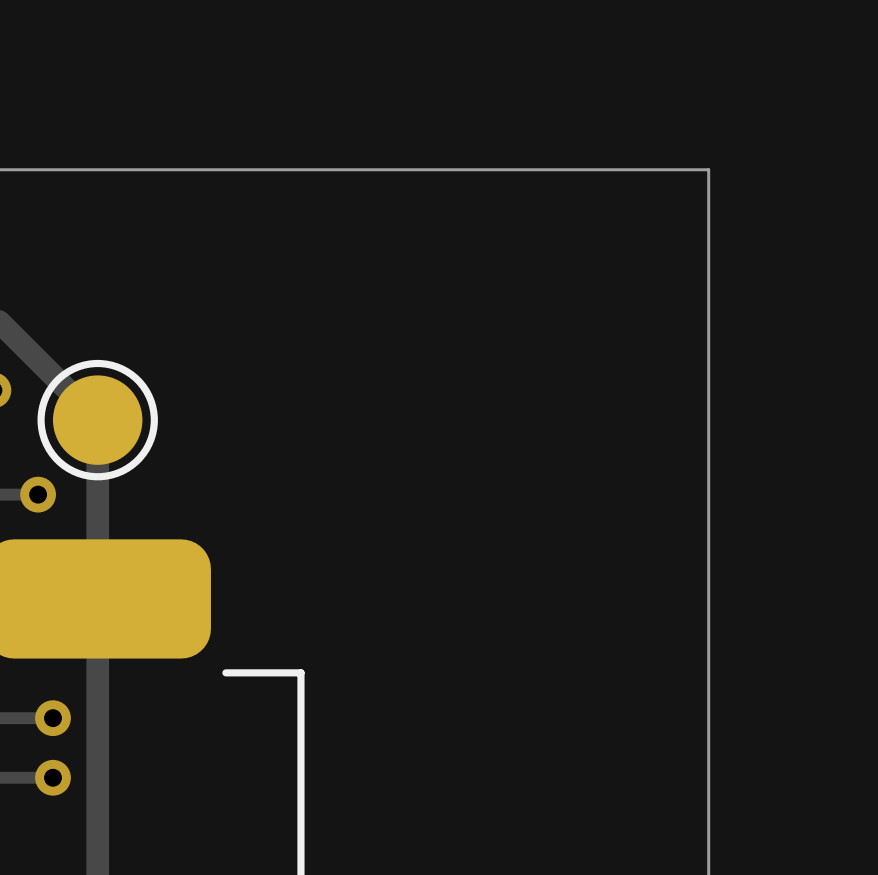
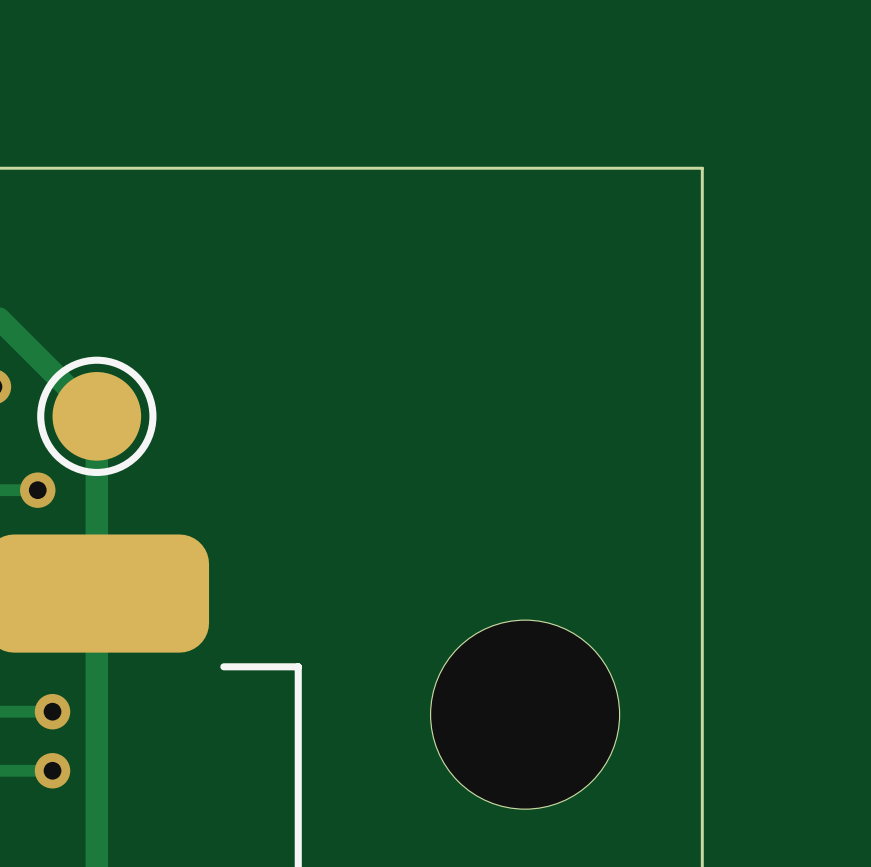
part: none -> (525, 714)

